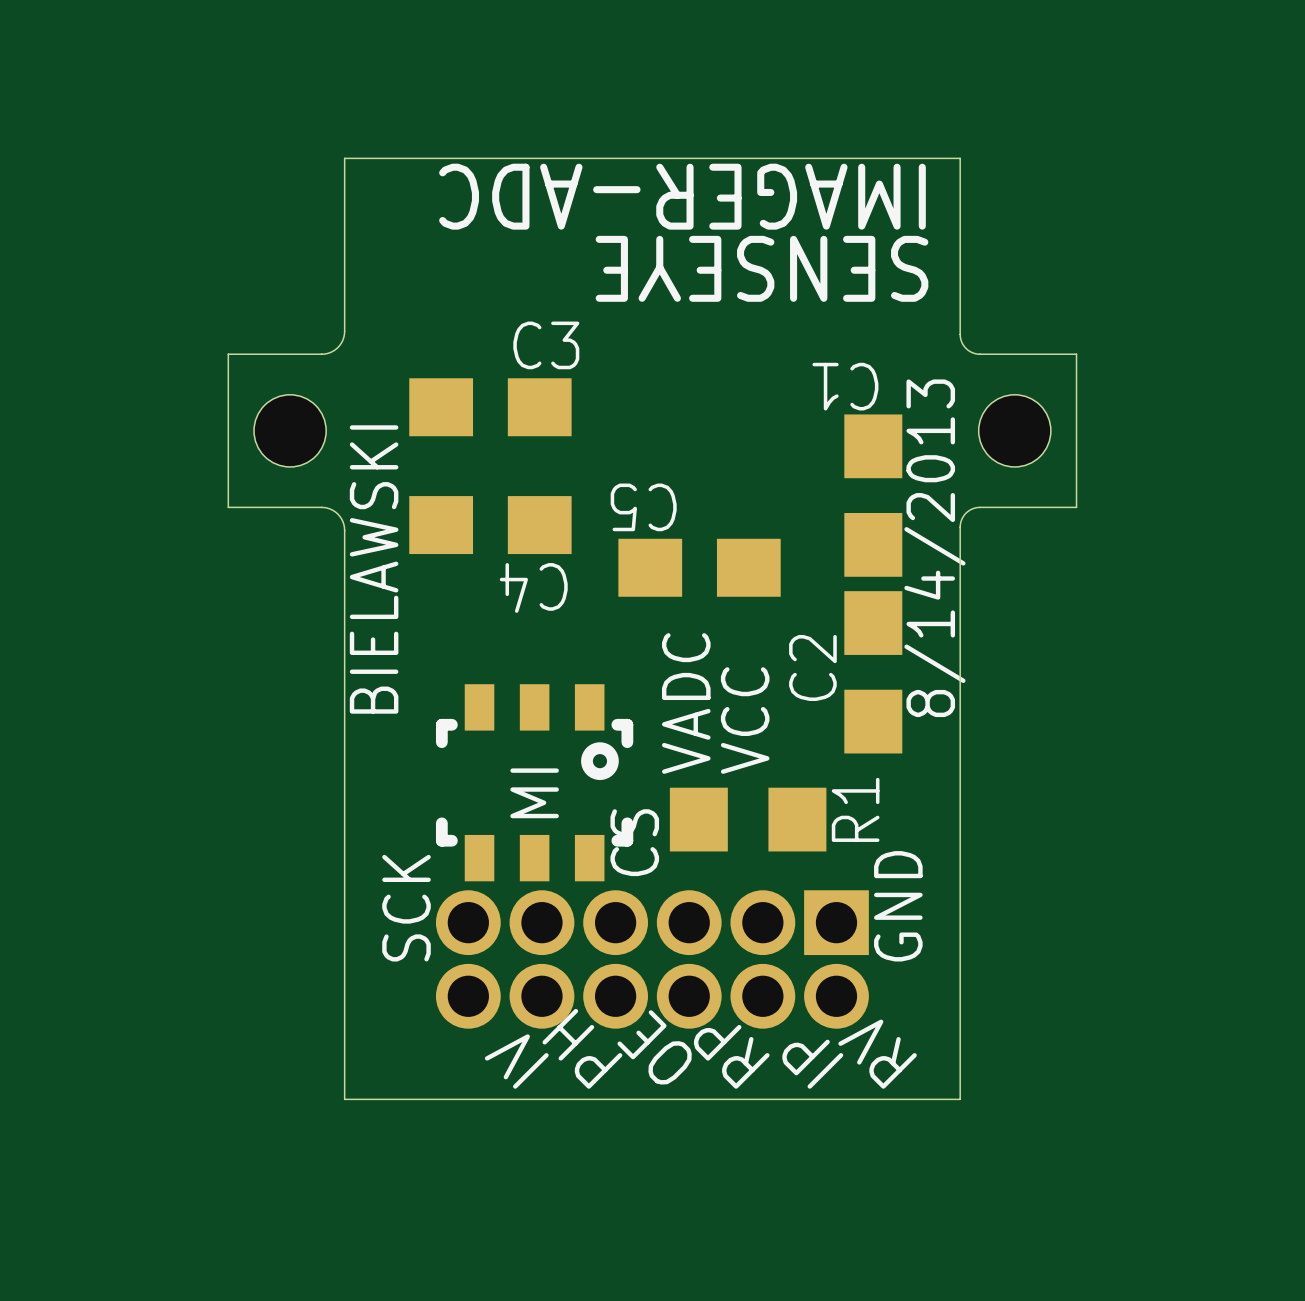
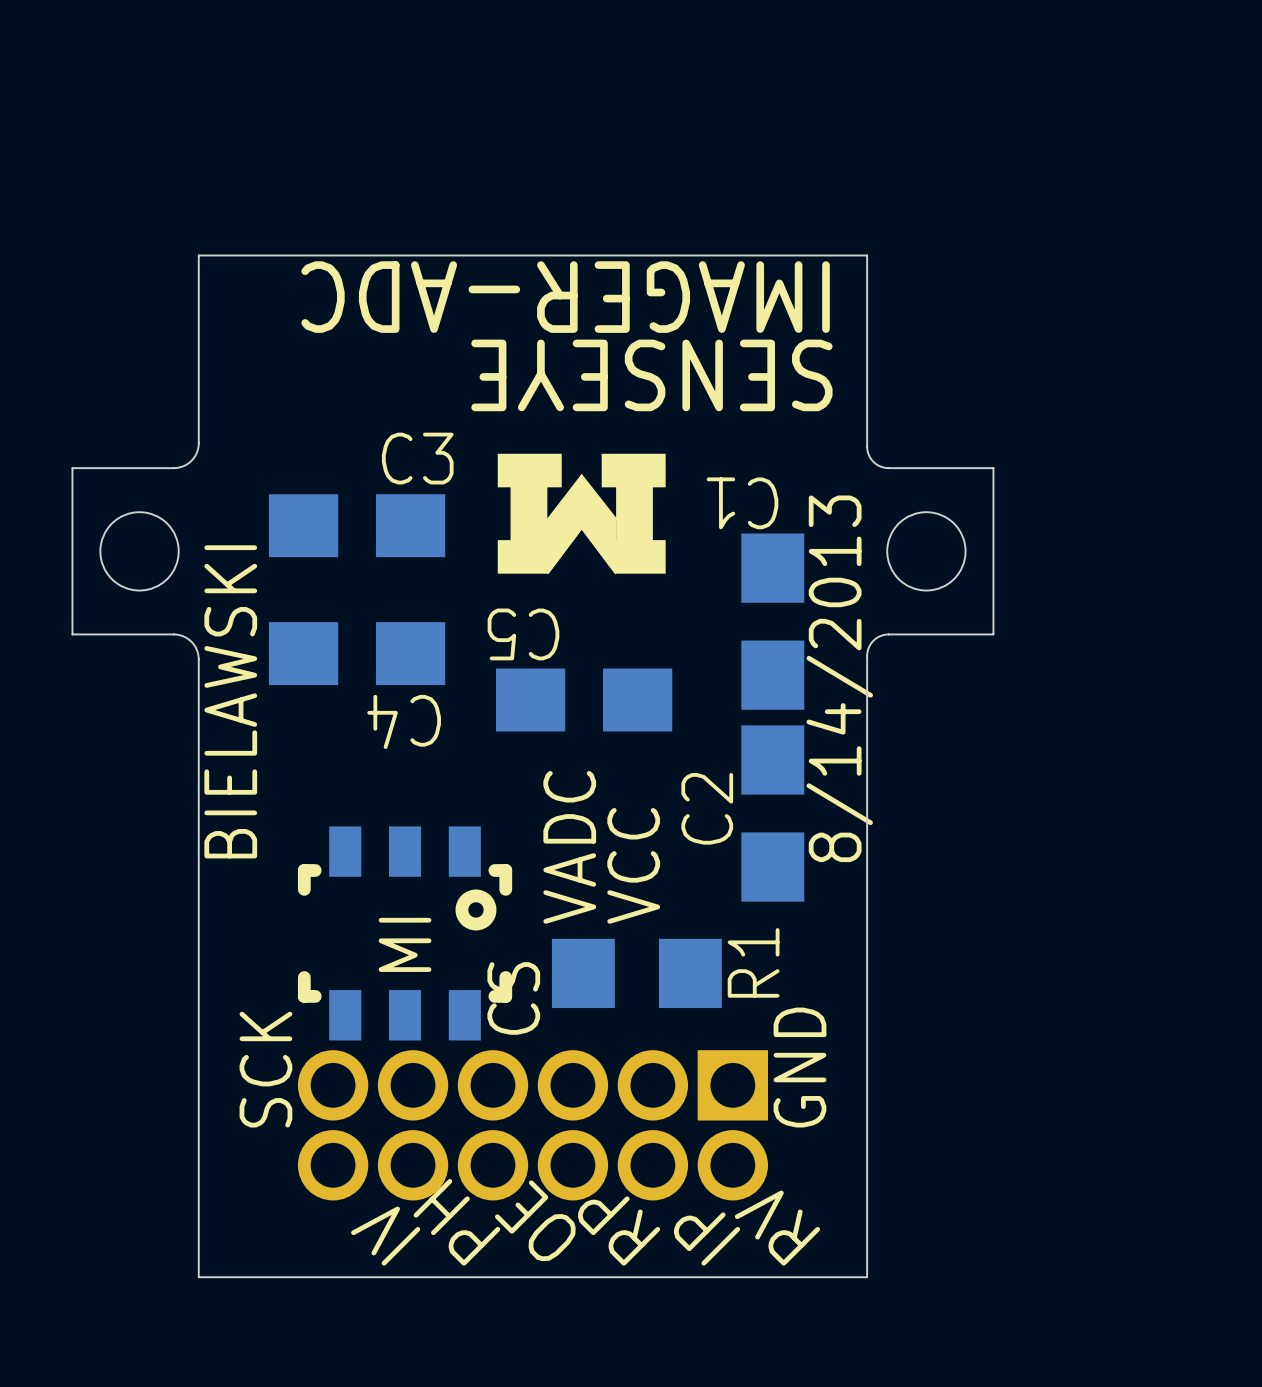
drawing: none -> [497, 453, 666, 574]

